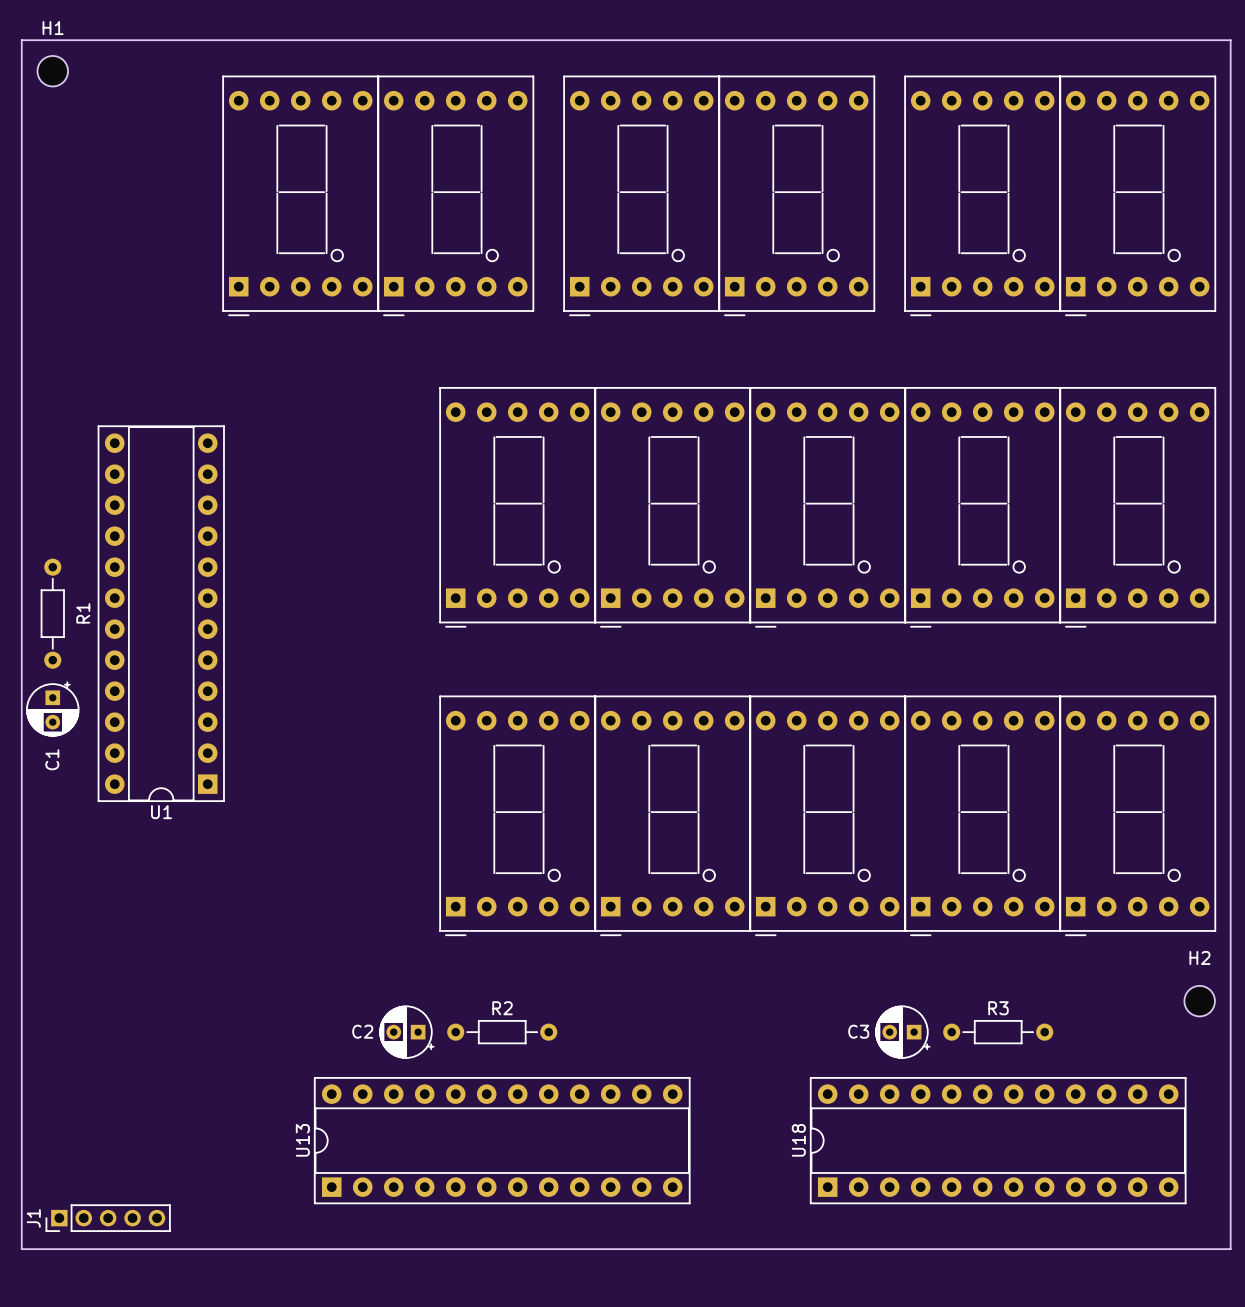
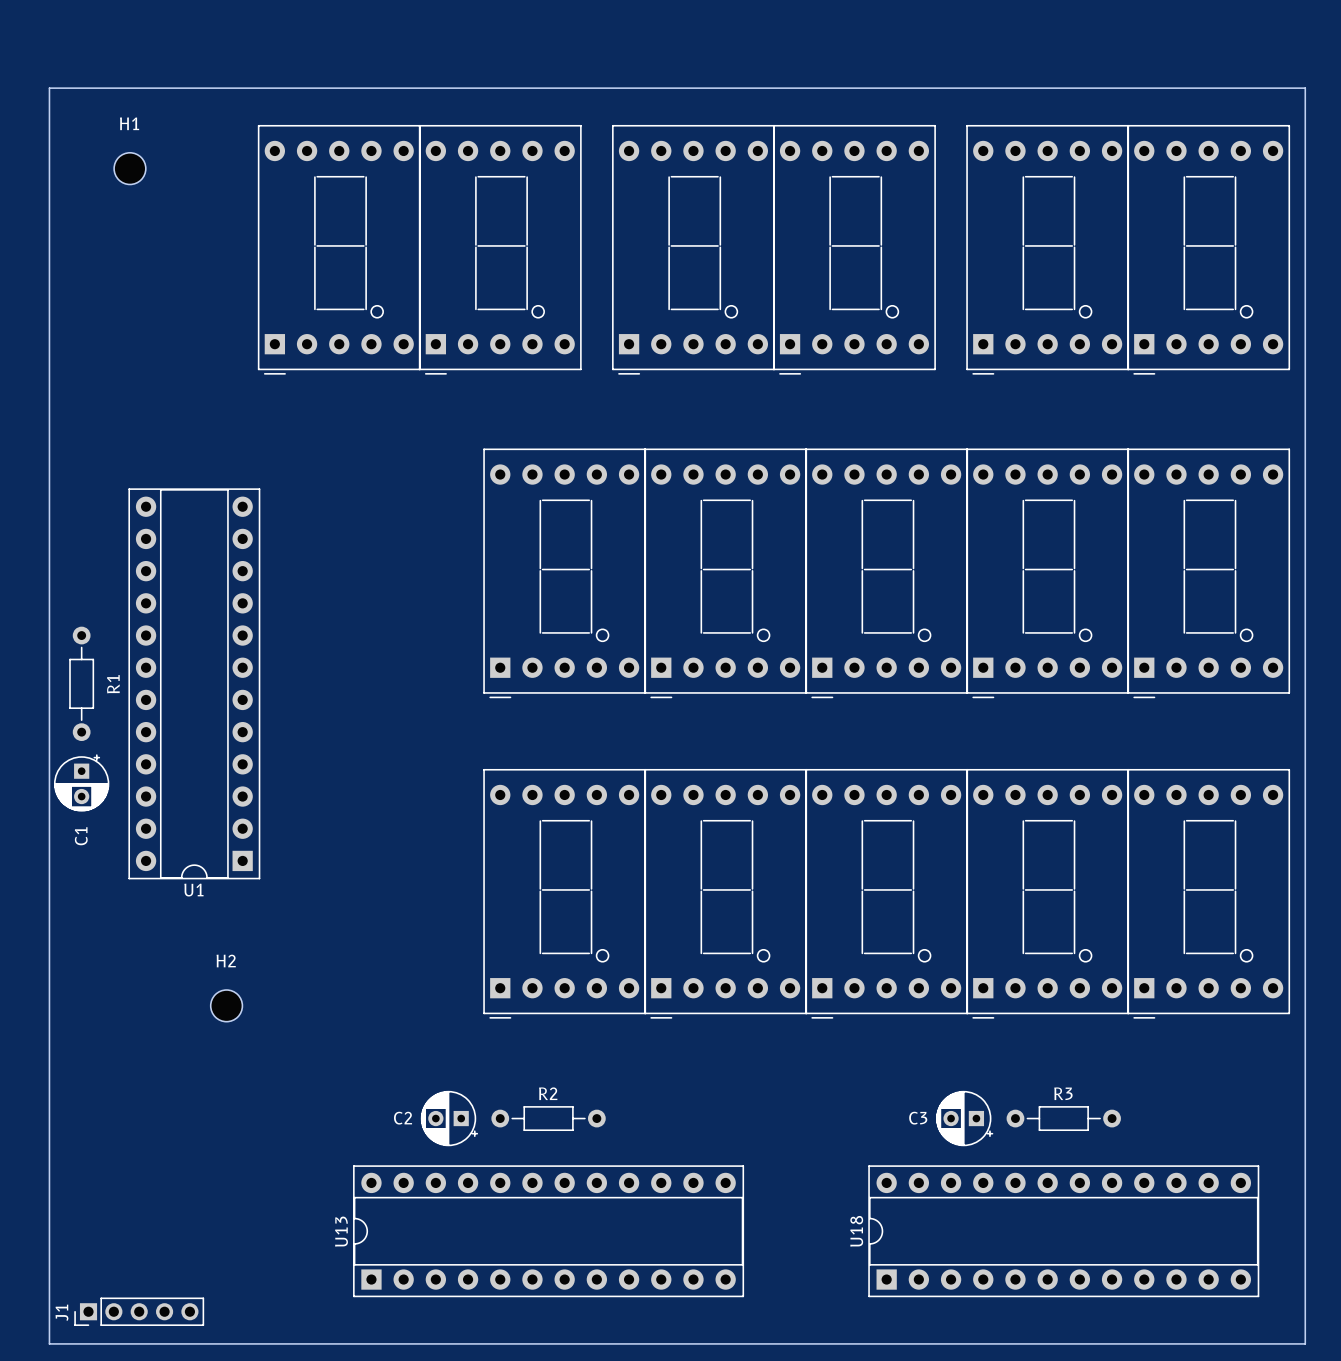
H1 position: (52, 71) -> (129, 168)
H2 position: (1199, 1001) -> (226, 1005)

